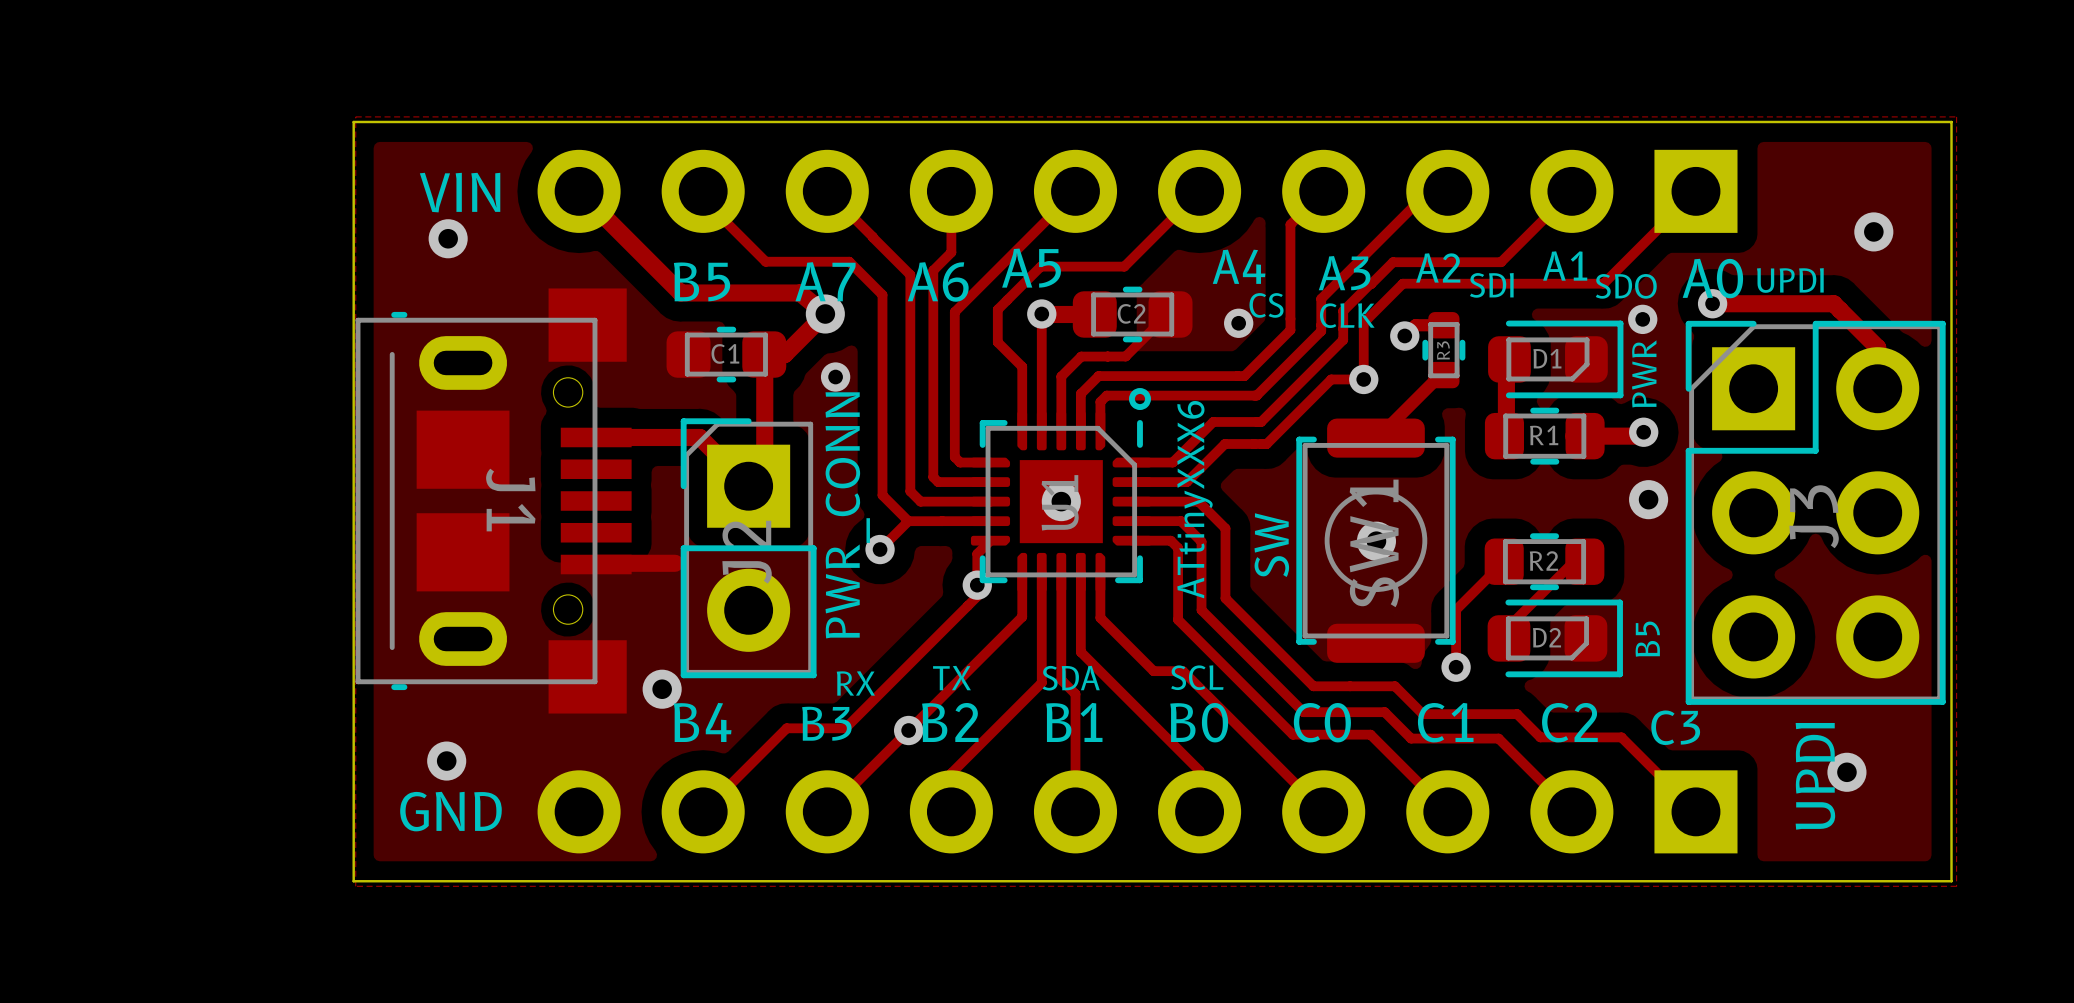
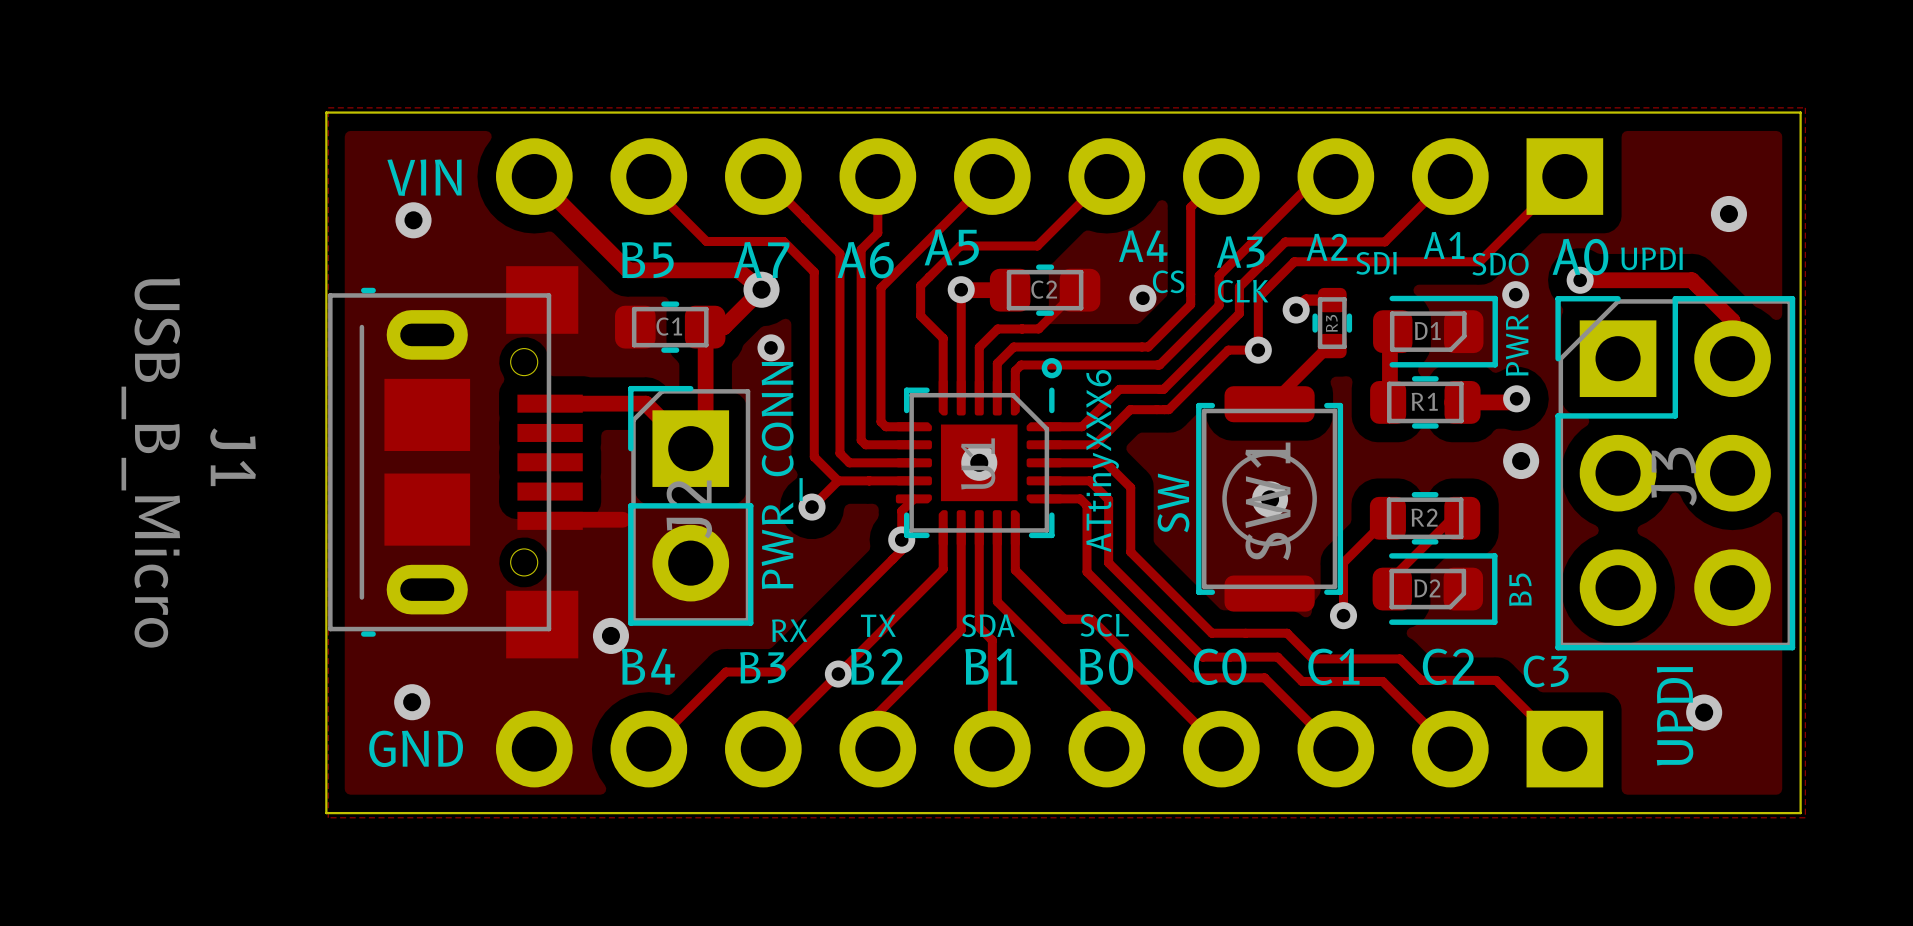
J1 name position: J1 (510, 500) -> J1 (233, 457)
J1 value: none -> USB_B_Micro (150, 463)

